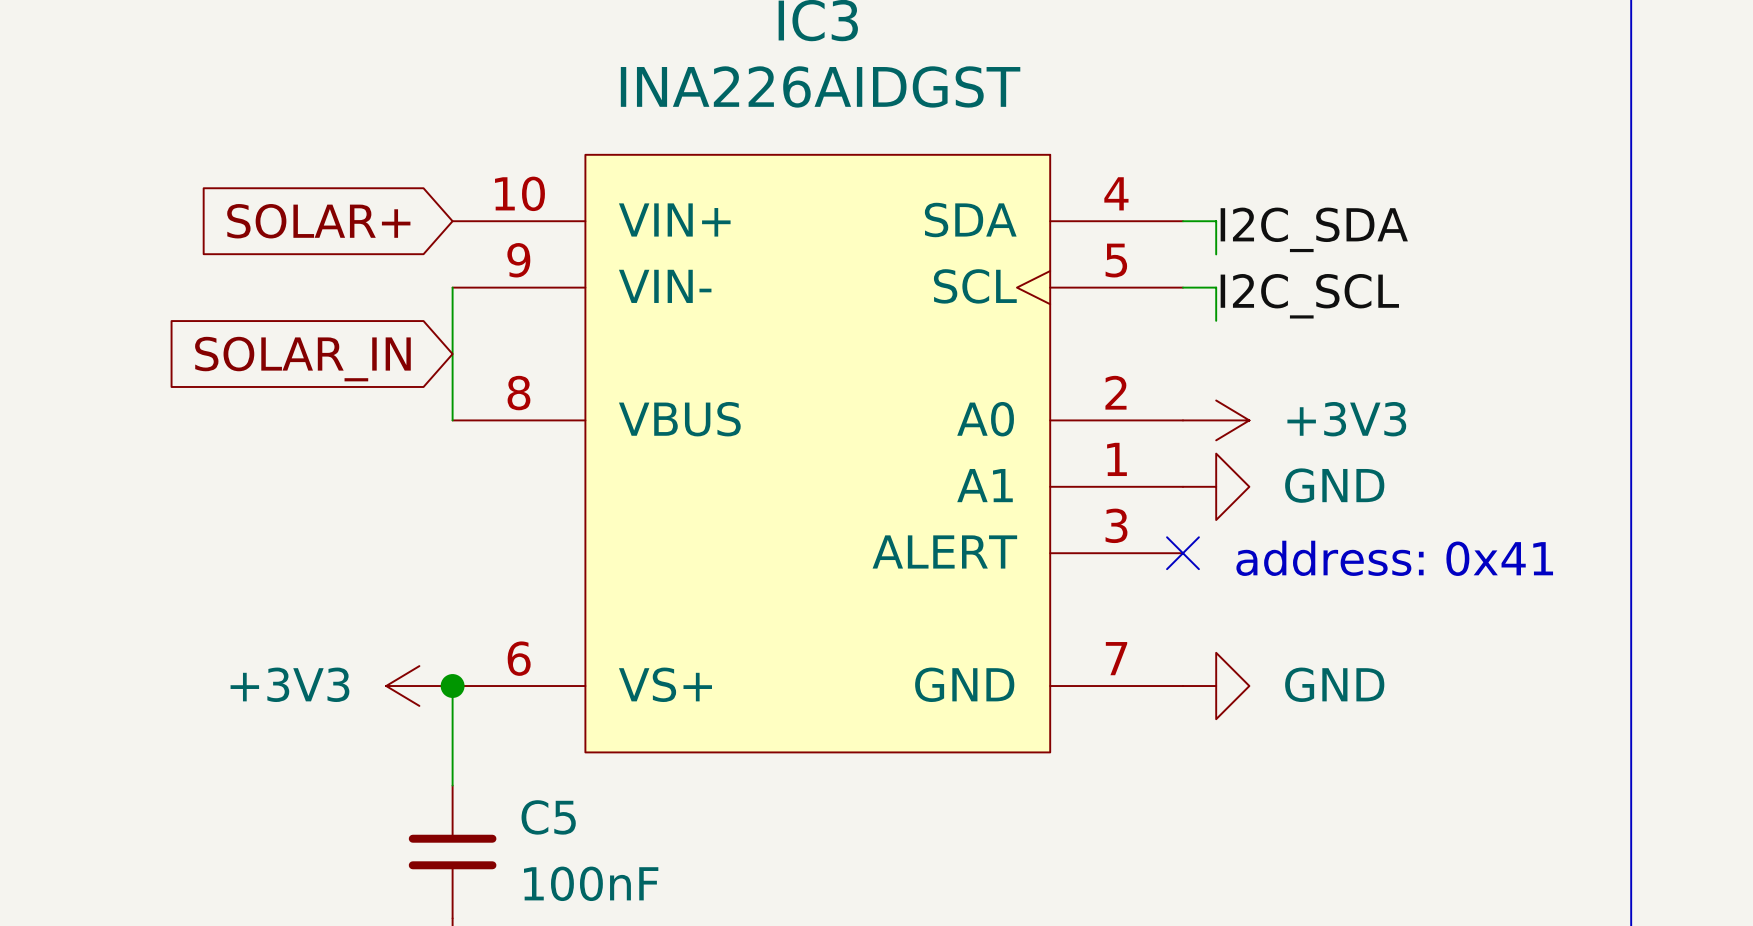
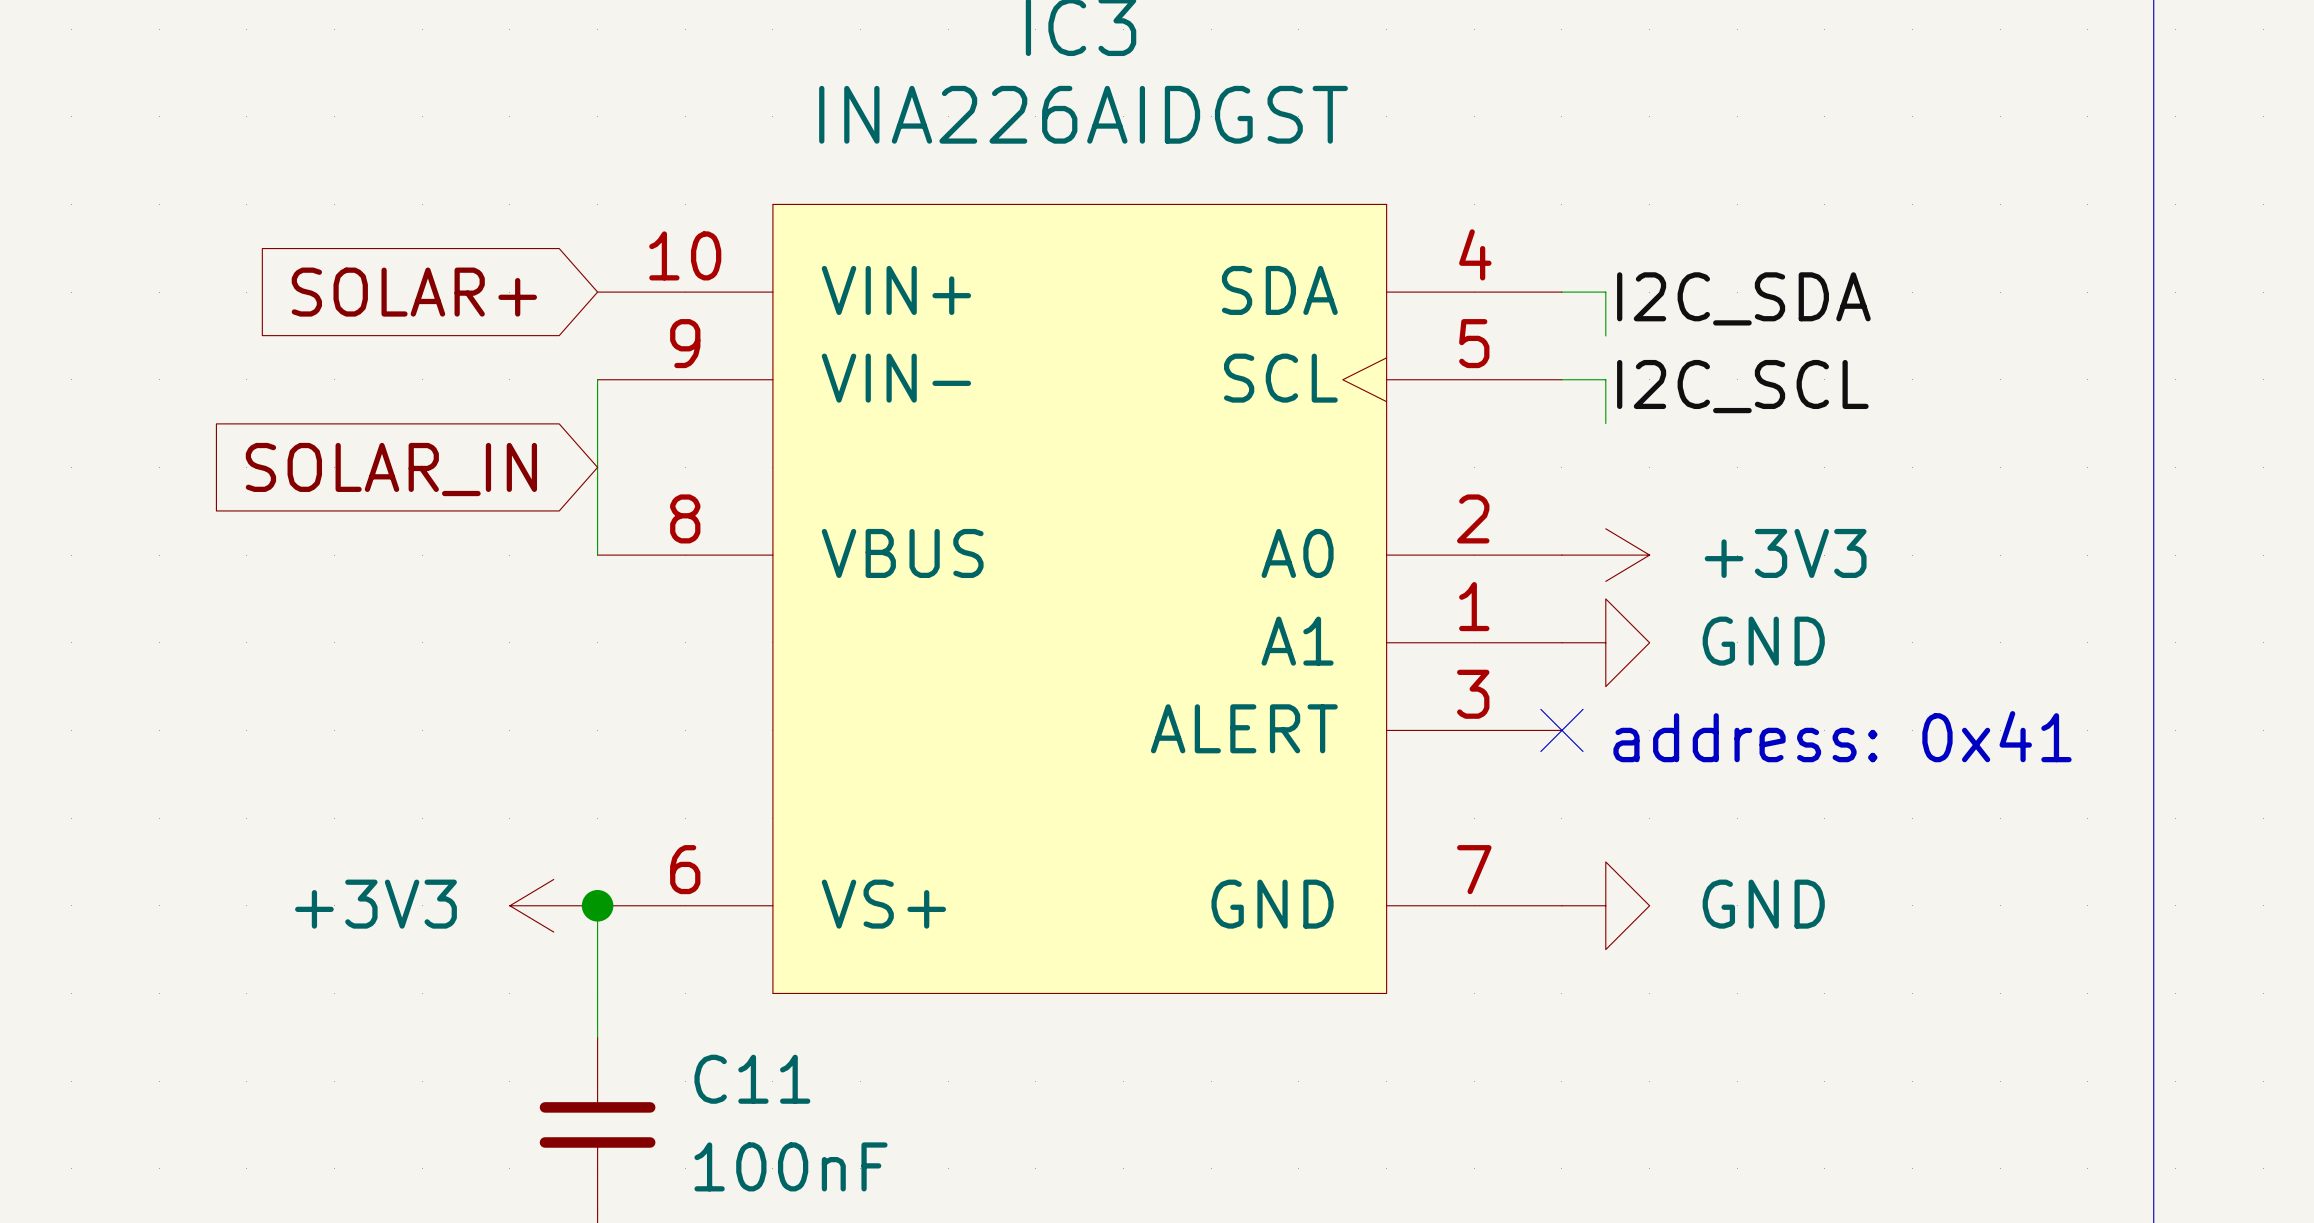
C5 name: C5 (548, 817) -> C11 (752, 1079)

